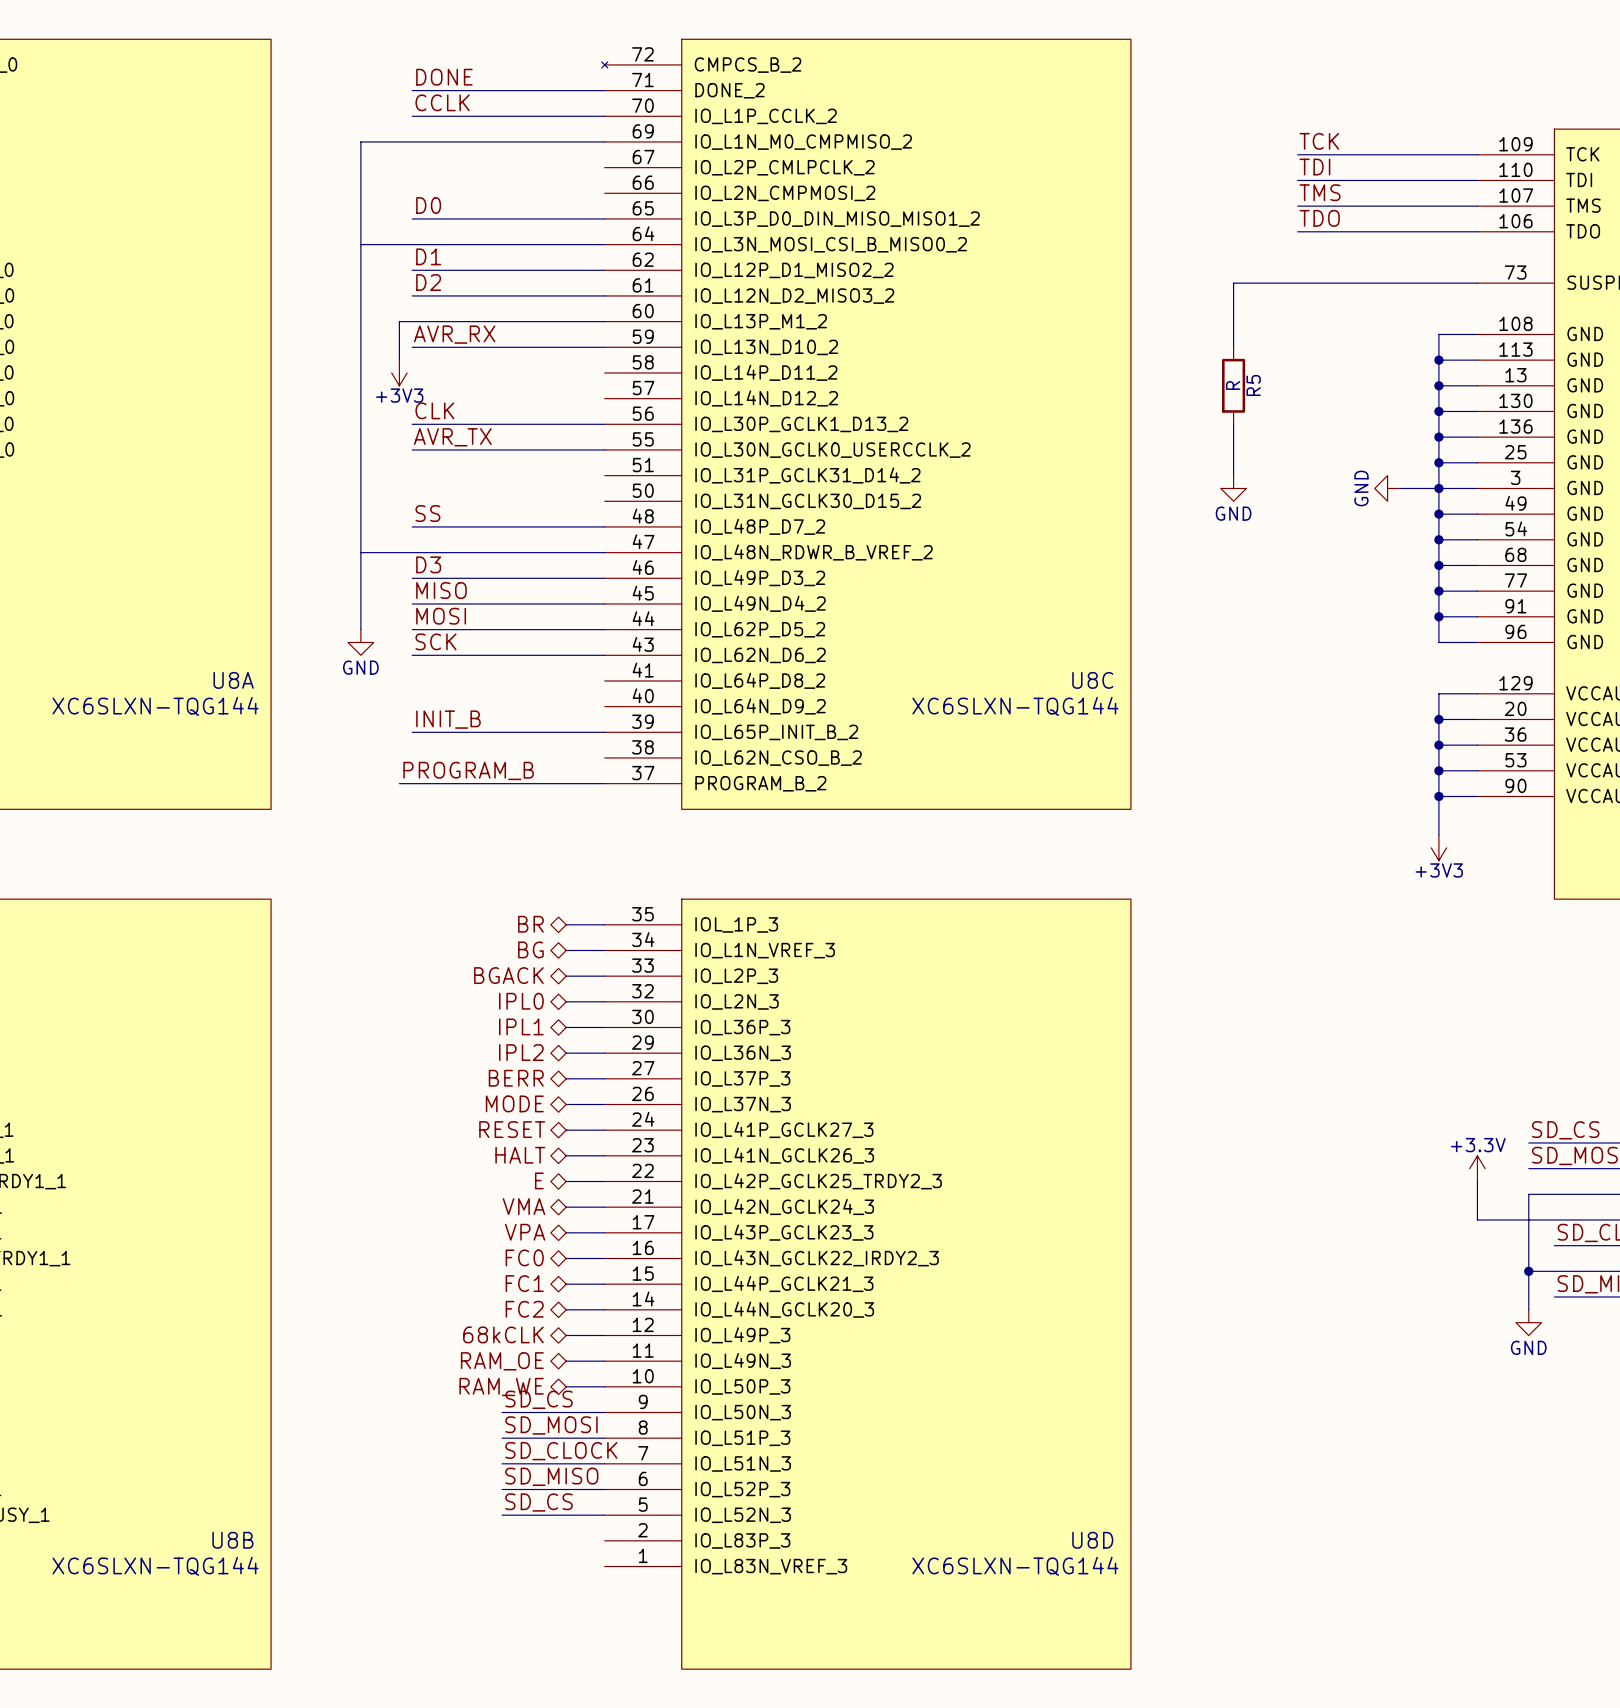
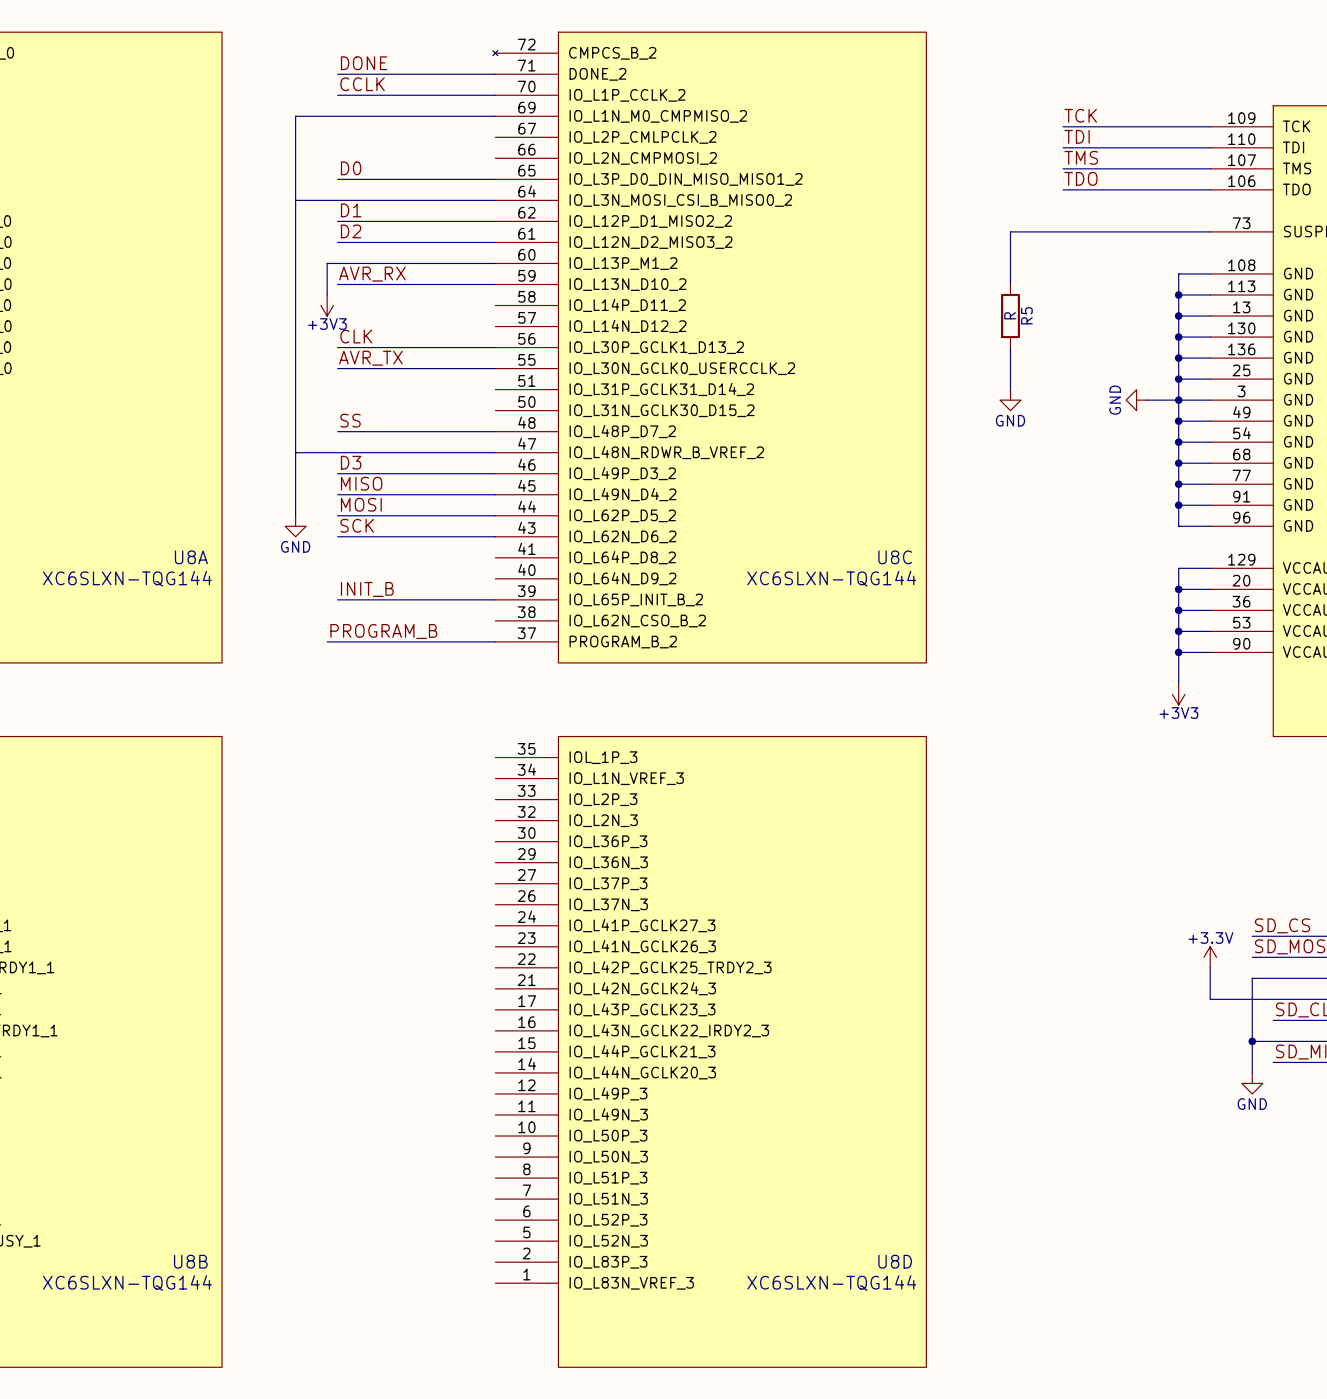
hierarchical label: BR (530, 924) -> none
wire: (566, 924) (604, 924) -> none
hierarchical label: BG (530, 949) -> none
wire: (566, 950) (604, 950) -> none
hierarchical label: BGACK (508, 975) -> none
wire: (566, 976) (604, 976) -> none
hierarchical label: IPL0 (521, 1001) -> none
wire: (566, 1001) (604, 1001) -> none
hierarchical label: IPL1 (521, 1026) -> none
wire: (566, 1027) (604, 1027) -> none
hierarchical label: IPL2 (521, 1052) -> none
wire: (566, 1053) (604, 1053) -> none
hierarchical label: BERR (516, 1078) -> none
wire: (566, 1078) (604, 1078) -> none
hierarchical label: MODE (514, 1103) -> none
wire: (566, 1104) (604, 1104) -> none
hierarchical label: RESET (512, 1129) -> none
wire: (566, 1130) (604, 1130) -> none
hierarchical label: HALT (520, 1155) -> none
wire: (566, 1155) (604, 1155) -> none
hierarchical label: E (539, 1180) -> none
wire: (566, 1181) (604, 1181) -> none
hierarchical label: VMA (523, 1206) -> none
wire: (566, 1207) (604, 1207) -> none
hierarchical label: VPA (525, 1232) -> none
wire: (566, 1232) (604, 1232) -> none
hierarchical label: FC0 (524, 1257) -> none
wire: (566, 1258) (604, 1258) -> none
hierarchical label: FC1 (524, 1283) -> none
wire: (566, 1284) (604, 1284) -> none
hierarchical label: FC2 (524, 1309) -> none
wire: (566, 1309) (604, 1309) -> none
hierarchical label: 68kCLK (503, 1334) -> none
wire: (566, 1335) (604, 1335) -> none
hierarchical label: RAM_OE (502, 1361) -> none
wire: (566, 1361) (604, 1361) -> none
hierarchical label: RAM_WE (501, 1386) -> none
wire: (566, 1386) (604, 1386) -> none
label: SD_CS (539, 1399) -> none
wire: (502, 1412) (604, 1412) -> none
label: SD_MOSI (551, 1425) -> none
wire: (502, 1438) (604, 1438) -> none
label: SD_CLOCK (561, 1451) -> none
wire: (502, 1463) (604, 1463) -> none
label: SD_MISO (551, 1476) -> none
wire: (502, 1489) (604, 1489) -> none
label: SD_CS (539, 1502) -> none
wire: (502, 1515) (604, 1515) -> none

